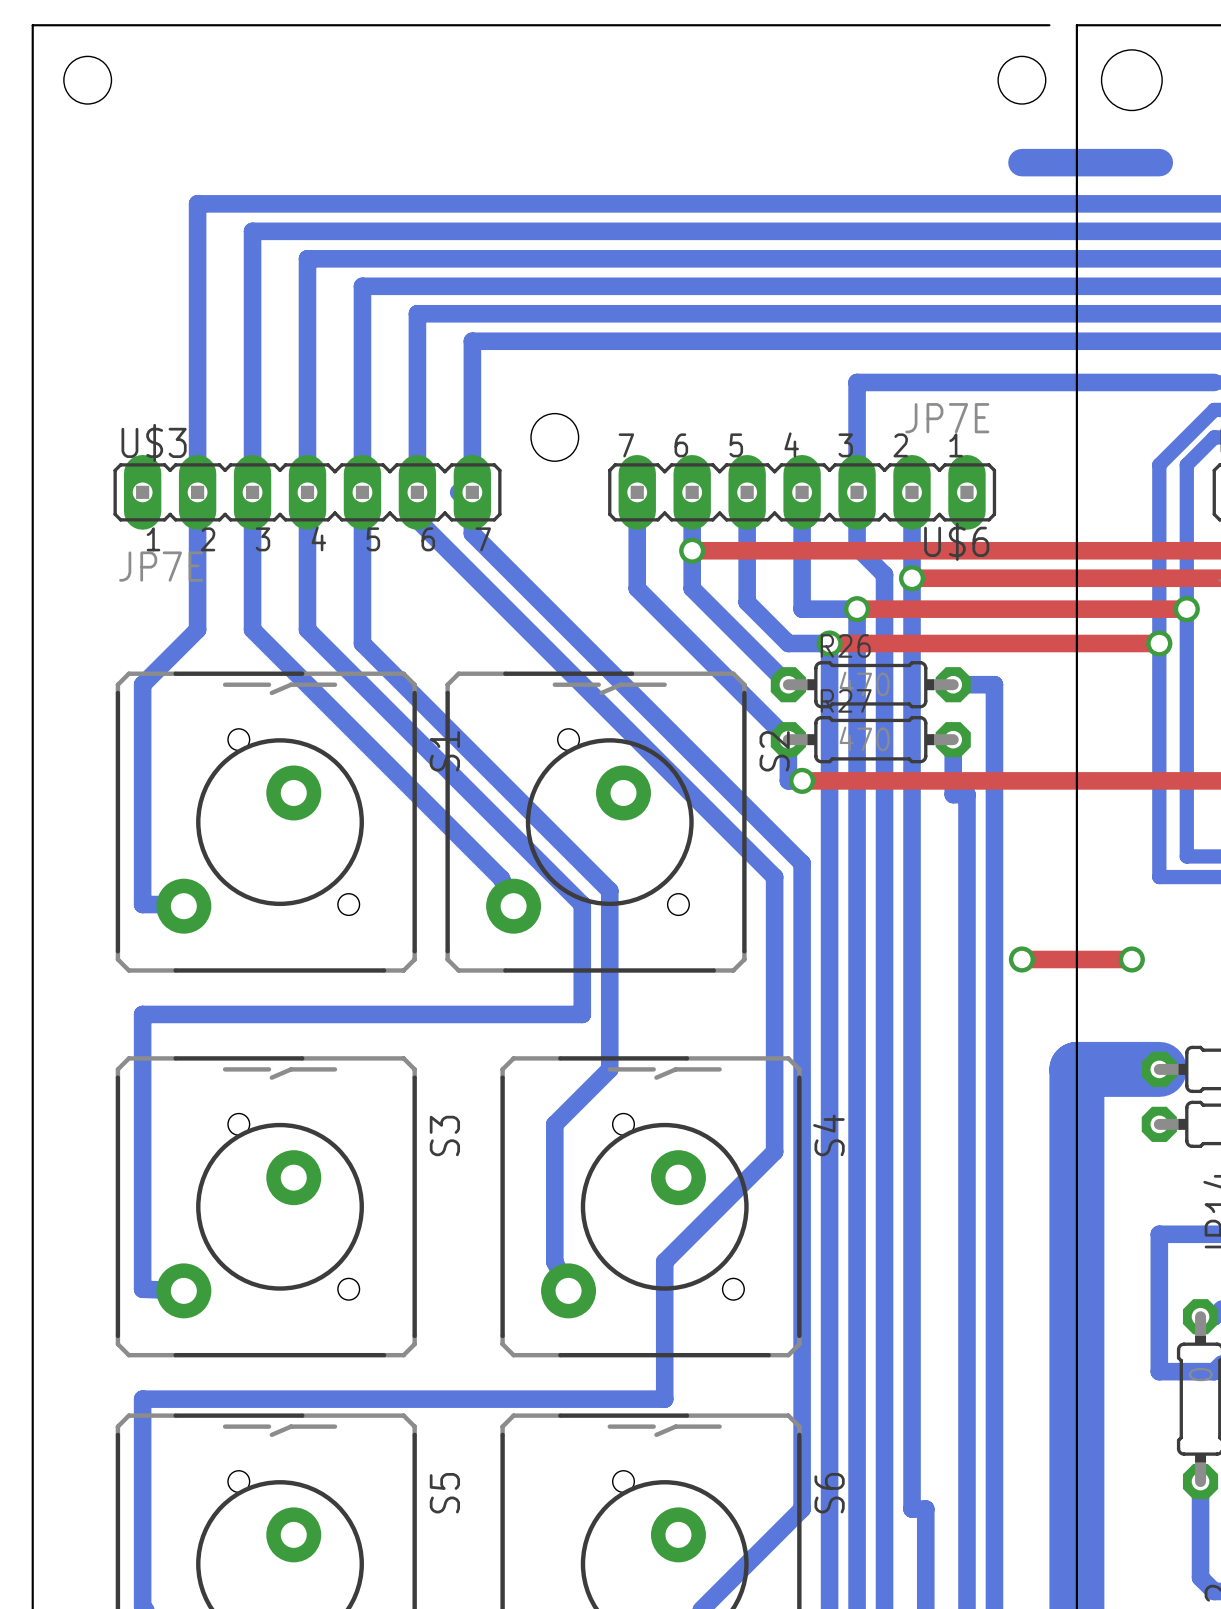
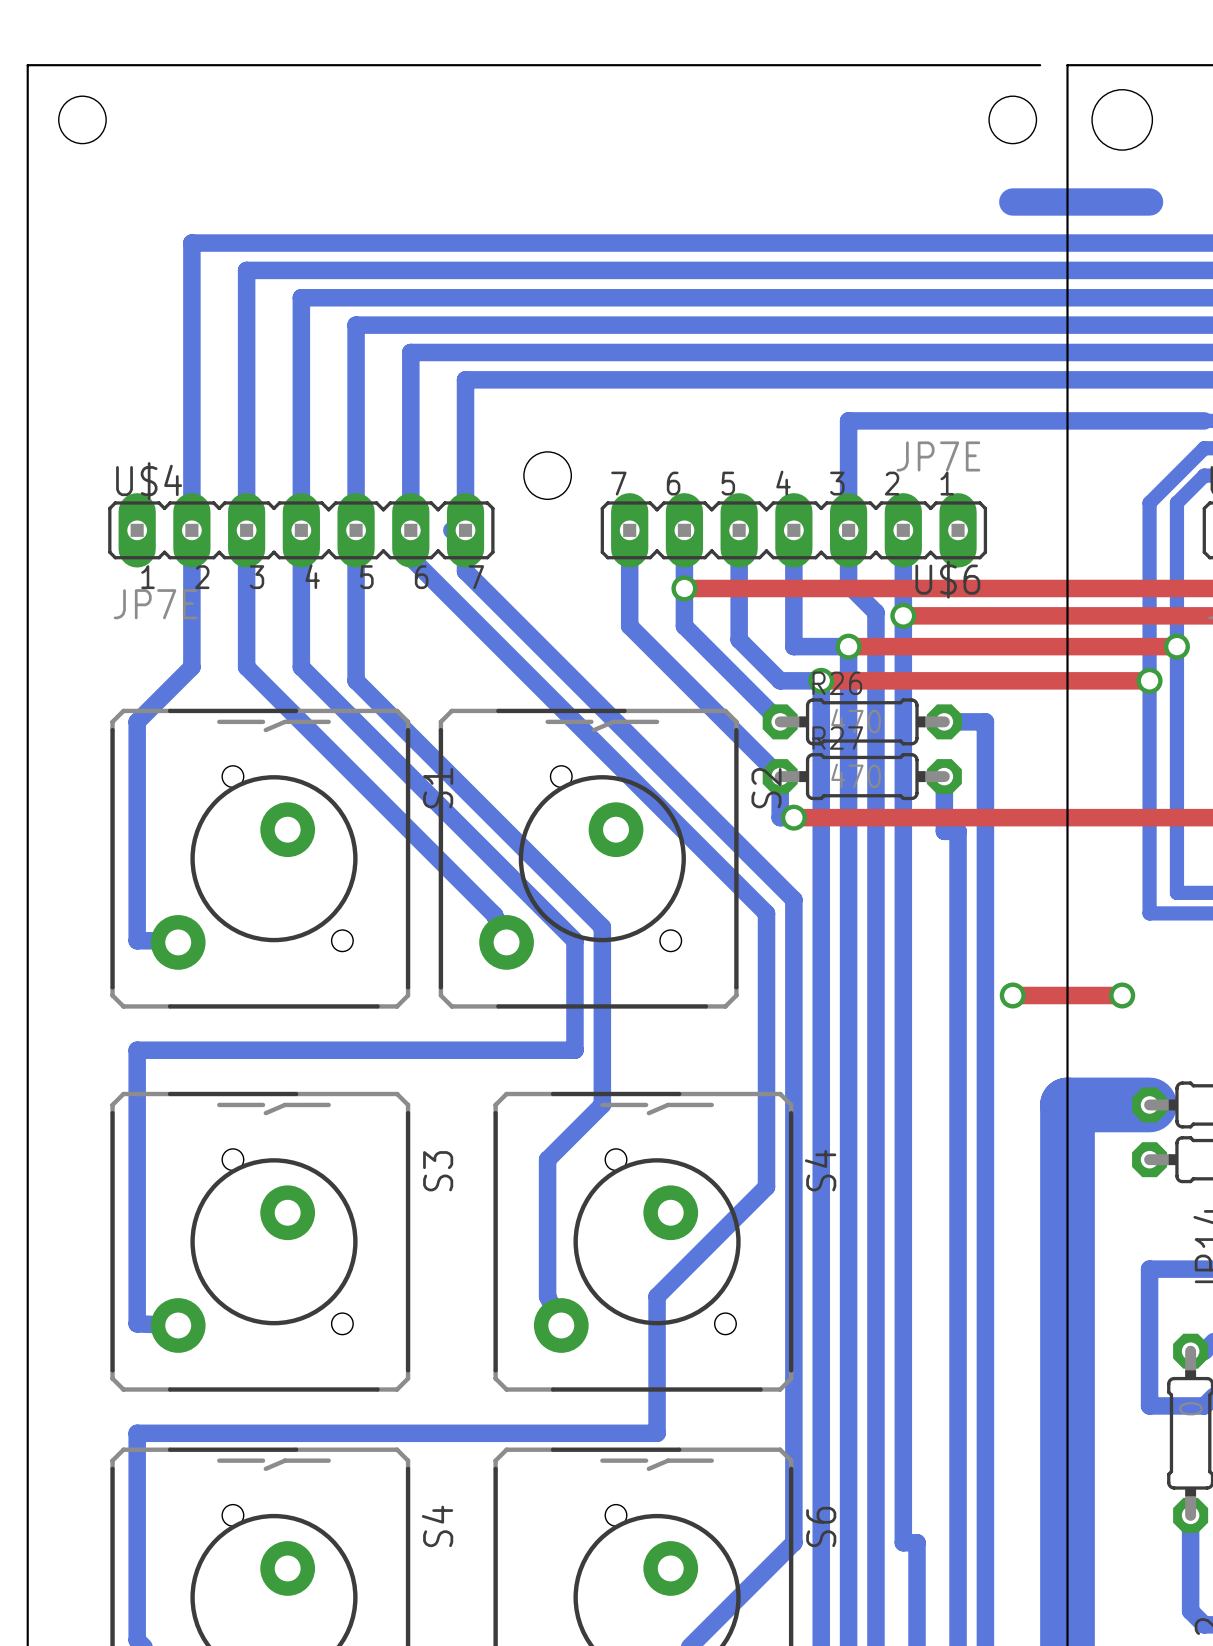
U$3 name: U$3 (154, 442) -> U$4 (149, 481)
S5 name: S5 (444, 1493) -> S4 (437, 1526)

